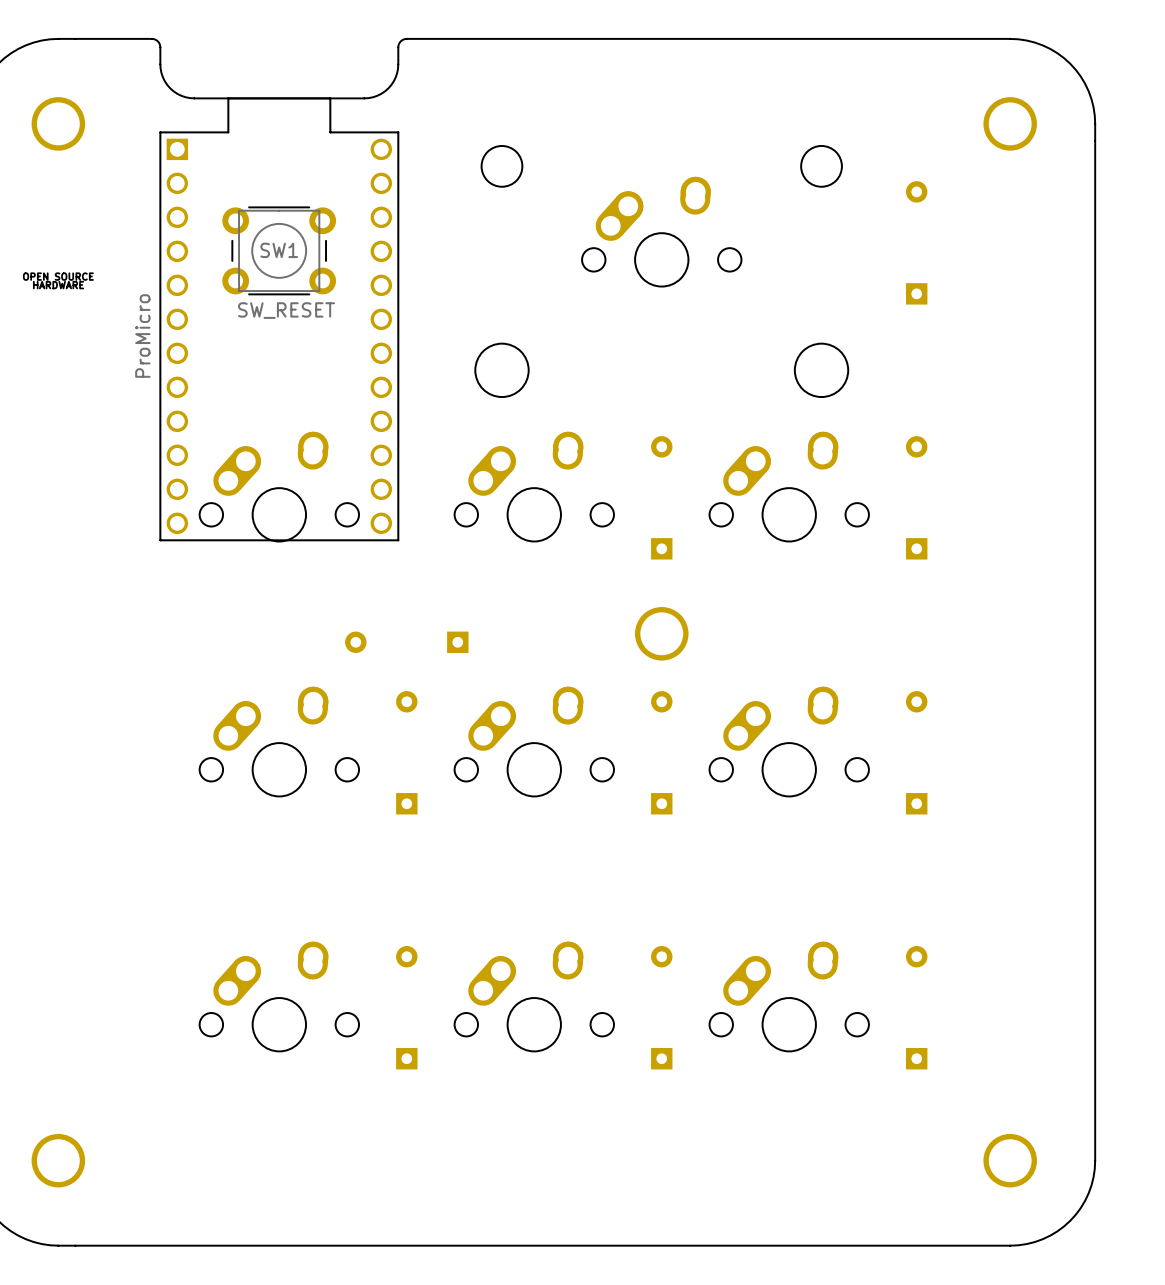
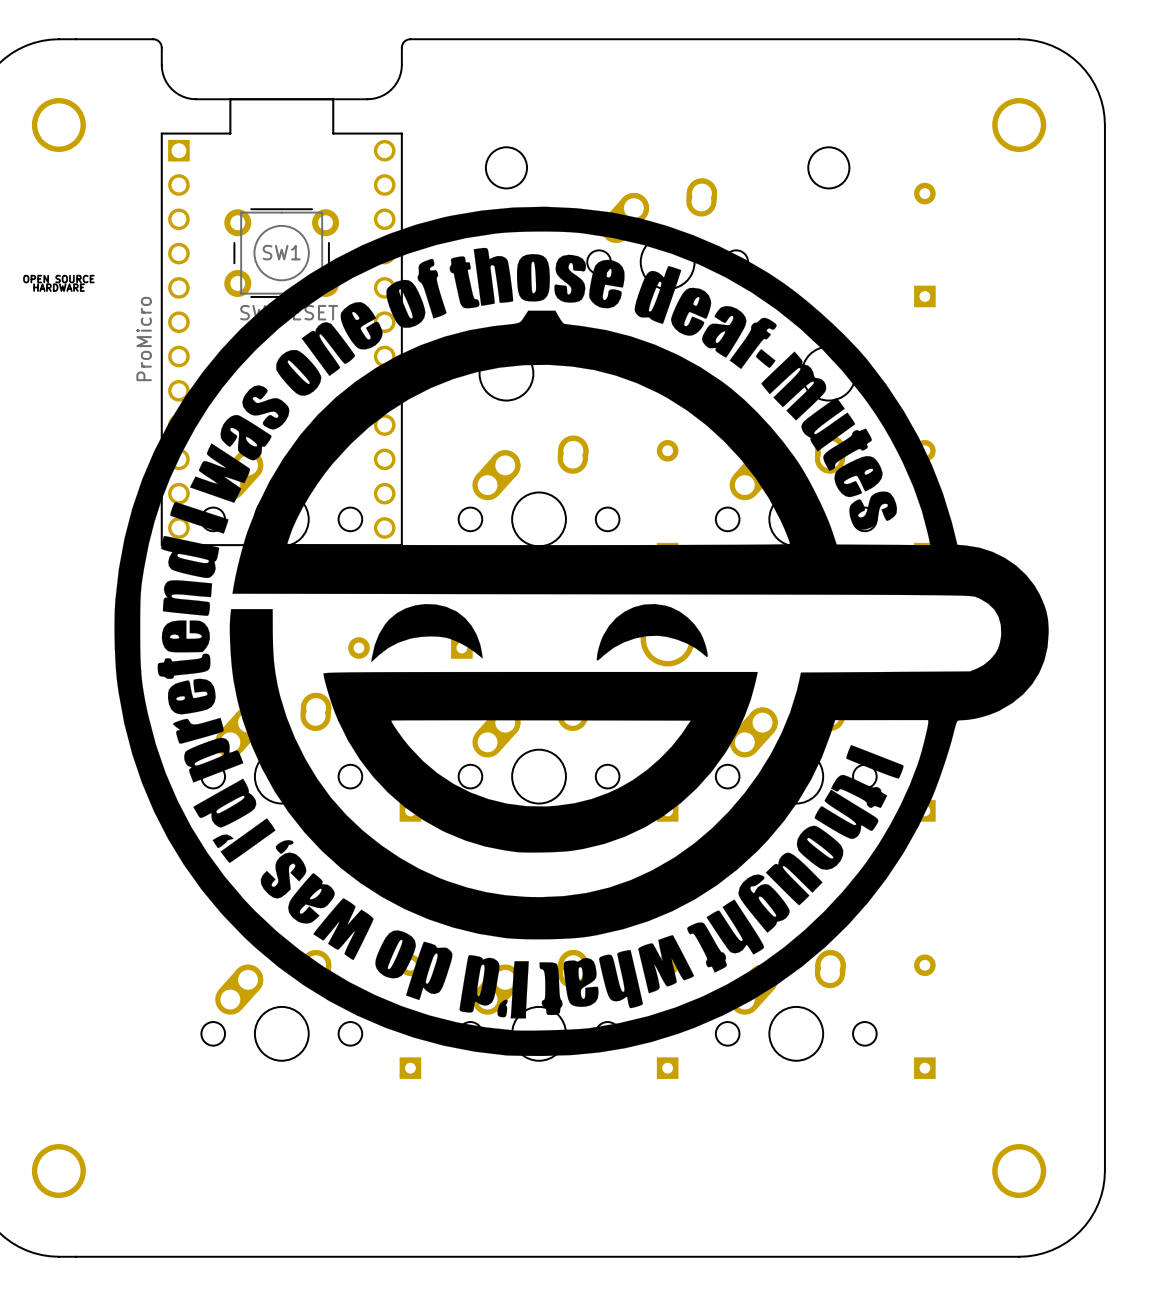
drawing: none -> [114, 206, 1049, 1057]

